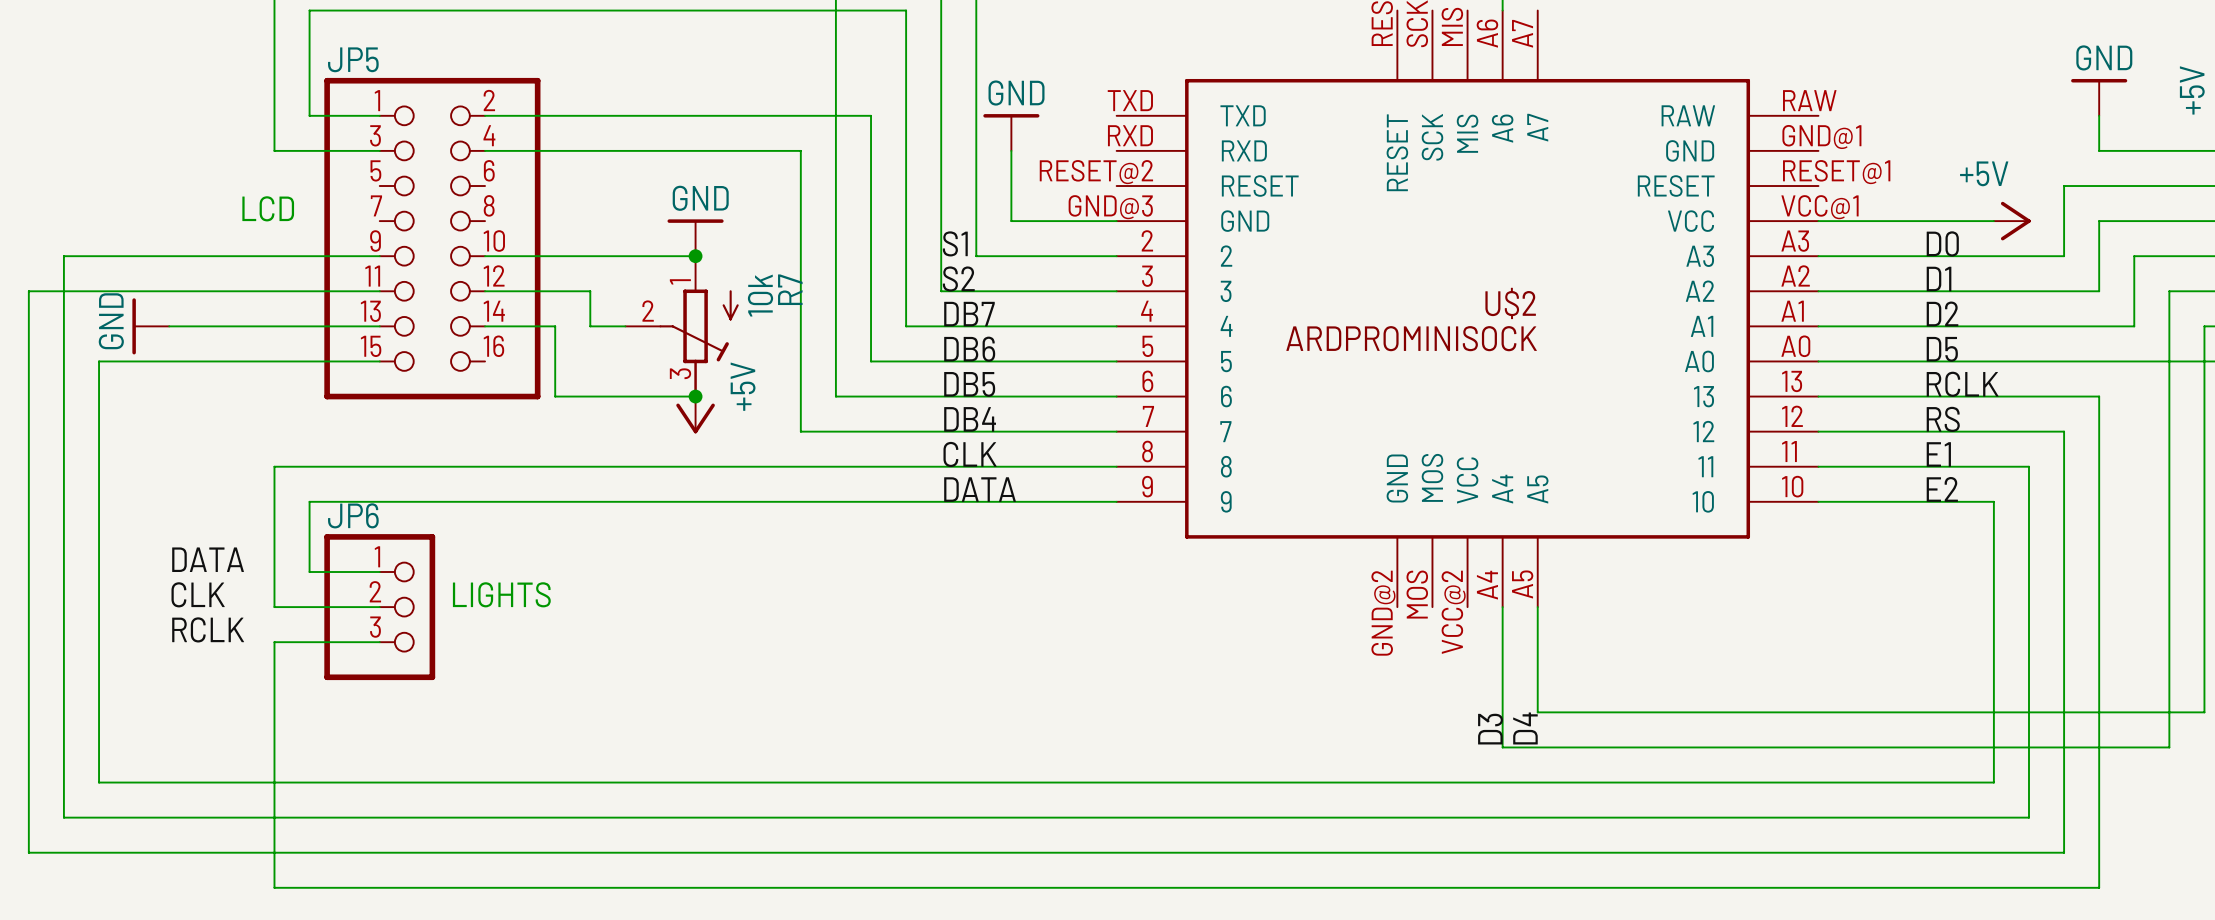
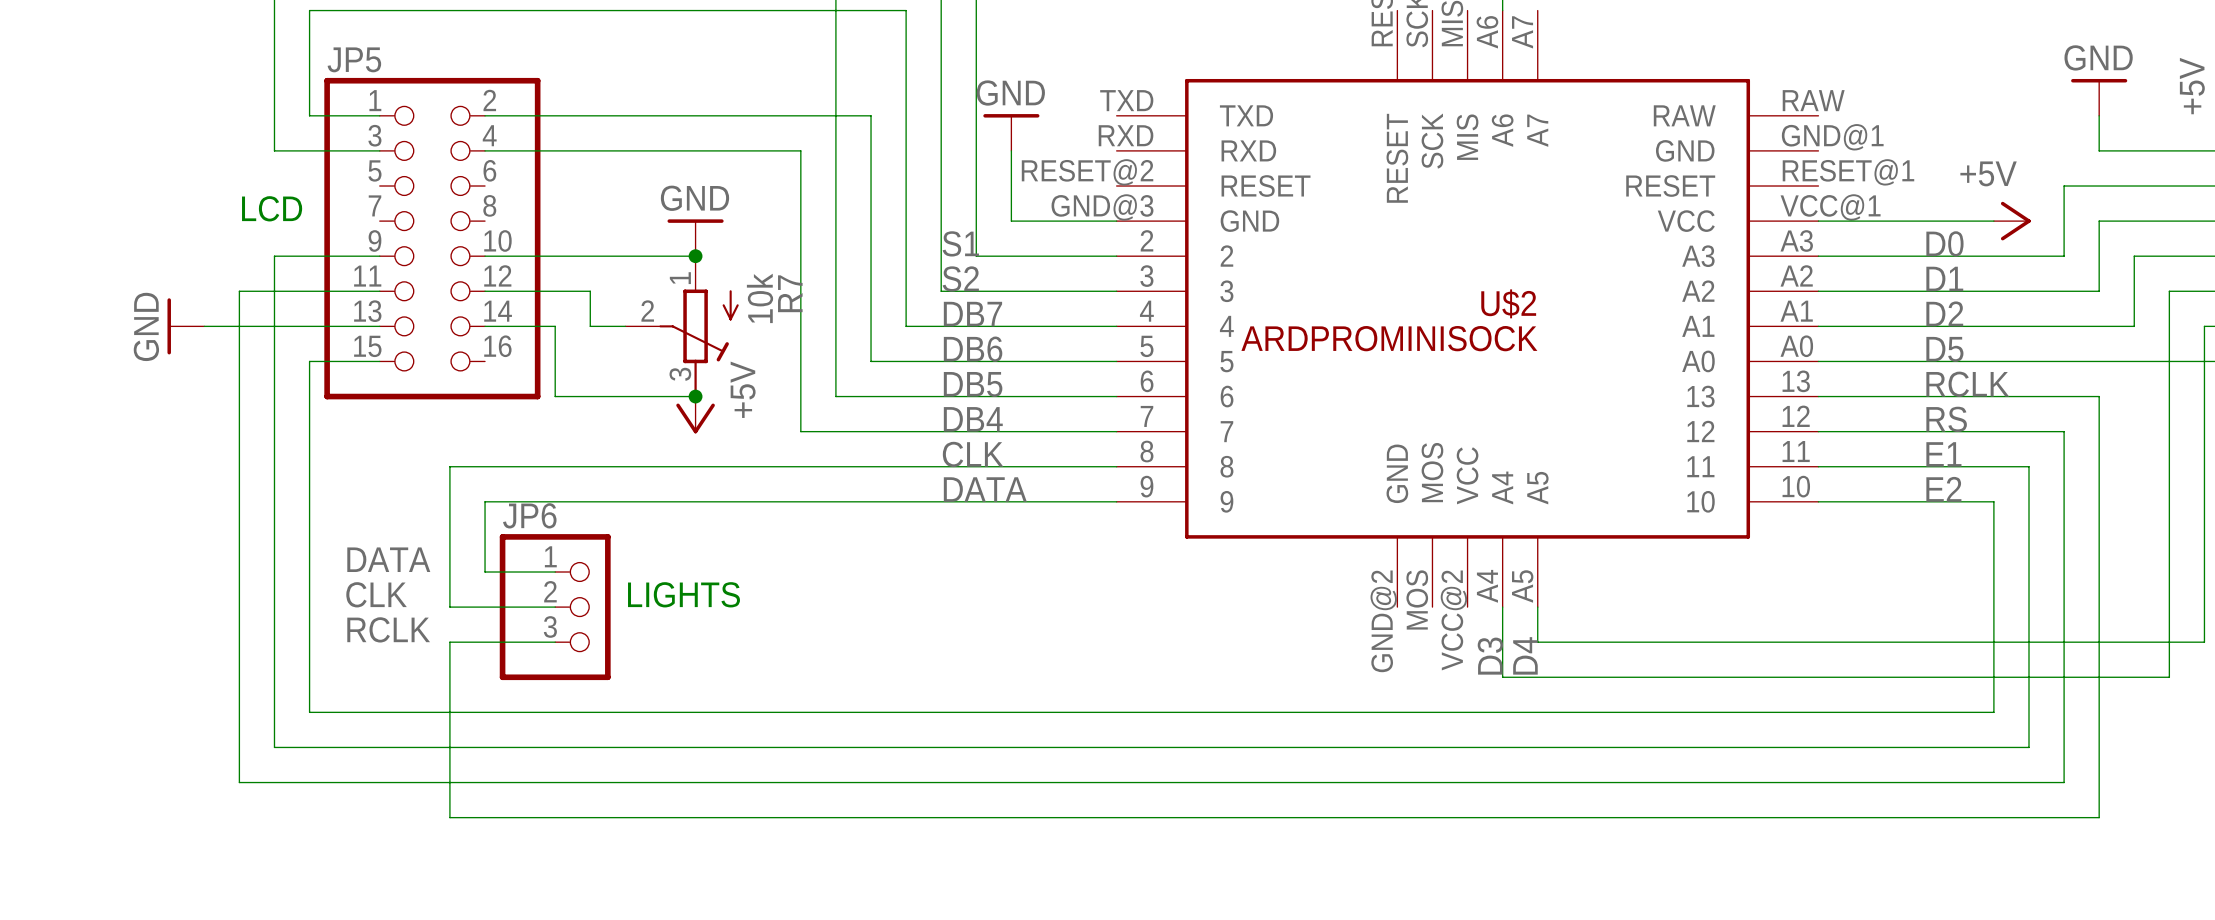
wire: (274, 256) (63, 256) (63, 817) (449, 817) -> (555, 642) (449, 642) (449, 817)
wire: (239, 291) (28, 291) (28, 852) (2064, 852) (2064, 782) -> none
power symbol position: GND (150, 326) -> GND (185, 326)
wire: (309, 361) (99, 361) (99, 782) (239, 782) -> (239, 291) (239, 782)
wire: (274, 466) (449, 466) -> (274, 466) (274, 256)
wire: none -> (449, 466) (449, 607) (555, 607)
wire: (309, 501) (485, 501) -> (309, 501) (309, 361)
wire: none -> (485, 501) (485, 572) (555, 572)
label position: DATA (208, 559) -> DATA (388, 559)
wire: (309, 572) (379, 572) -> (309, 572) (309, 712) (1537, 712)
label position: CLK (198, 594) -> CLK (376, 594)
text position: LIGHTS (501, 594) -> LIGHTS (683, 594)
wire: (274, 607) (379, 607) -> (274, 607) (274, 642)
JP6 position: (379, 607) -> (555, 607)
label position: RCLK (208, 629) -> RCLK (388, 629)
wire: (274, 642) (379, 642) -> none
wire: (1537, 642) (1537, 712) -> (1537, 642) (2204, 642)
wire: (2204, 642) (2204, 712) (1993, 712) (1993, 782) -> (2064, 782) (1993, 782)
wire: (1502, 677) (1502, 747) -> (1502, 677) (2169, 677)
wire: (2169, 677) (2169, 747) (2029, 747) (2029, 817) -> (2099, 817) (2029, 817)
label position: D4 (1525, 728) -> D4 (1525, 655)
label position: D3 (1490, 729) -> D3 (1490, 656)
wire: (274, 747) (274, 887) (2099, 887) (2099, 817) -> (274, 747) (1502, 747)

